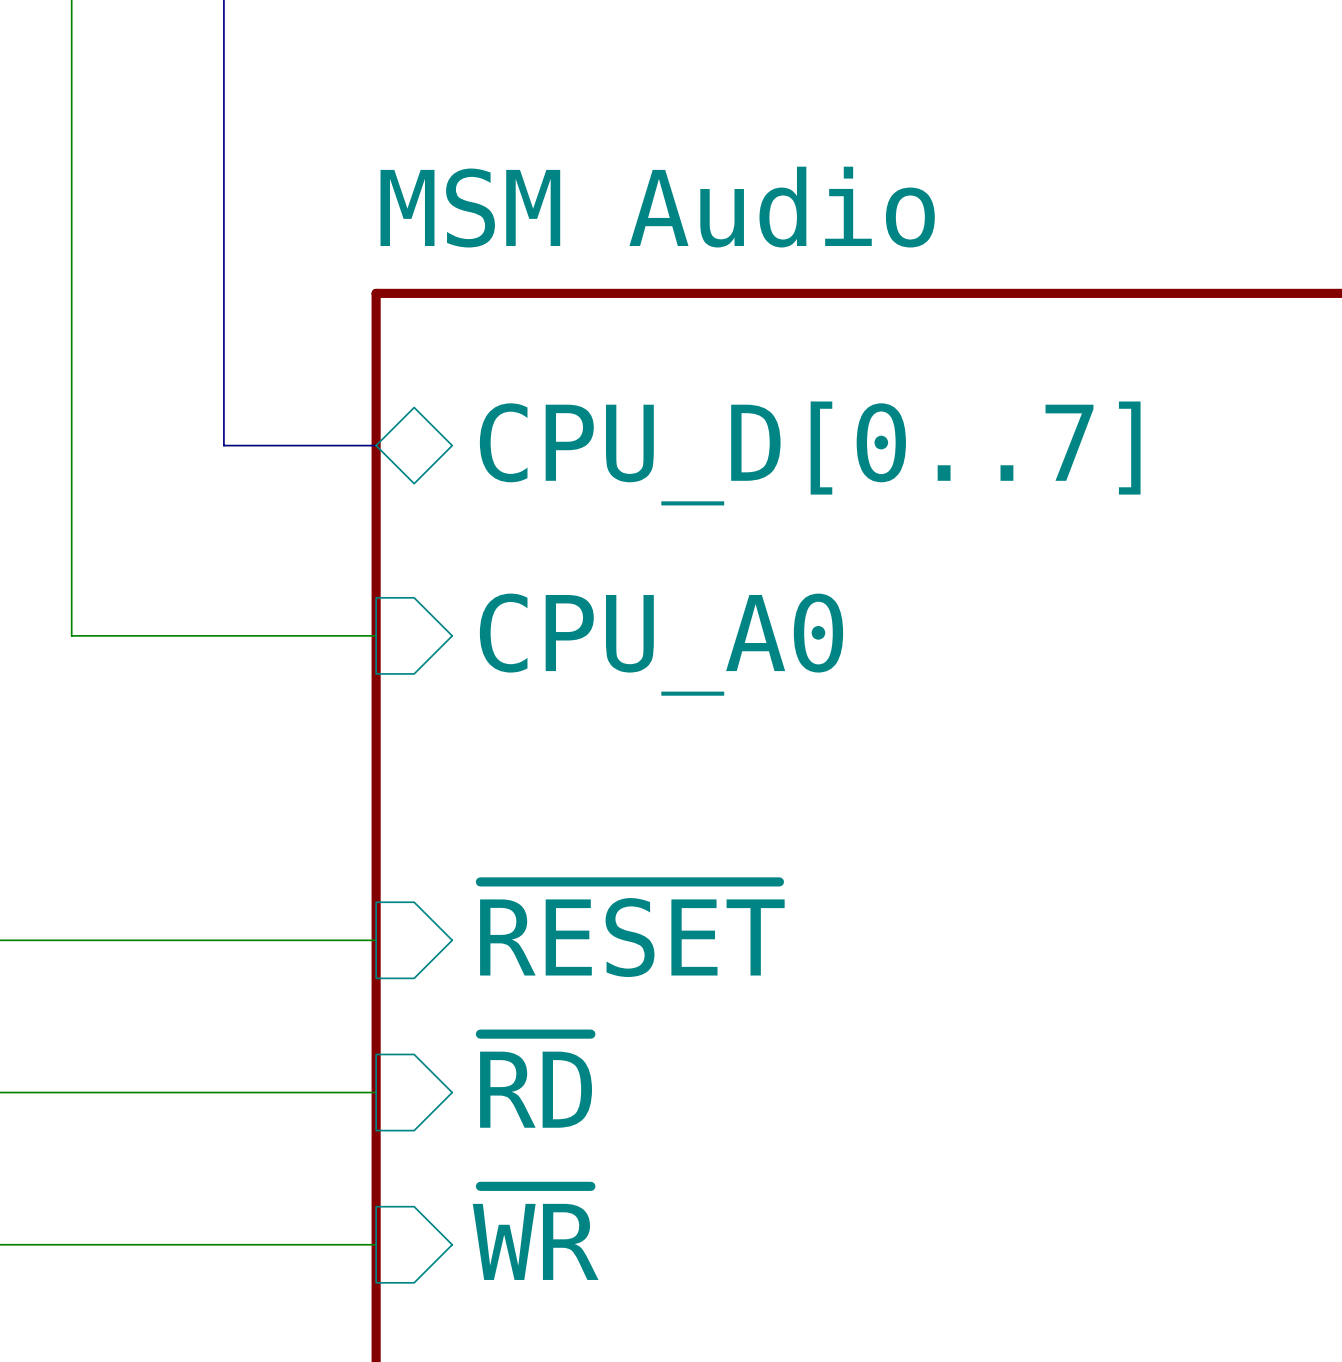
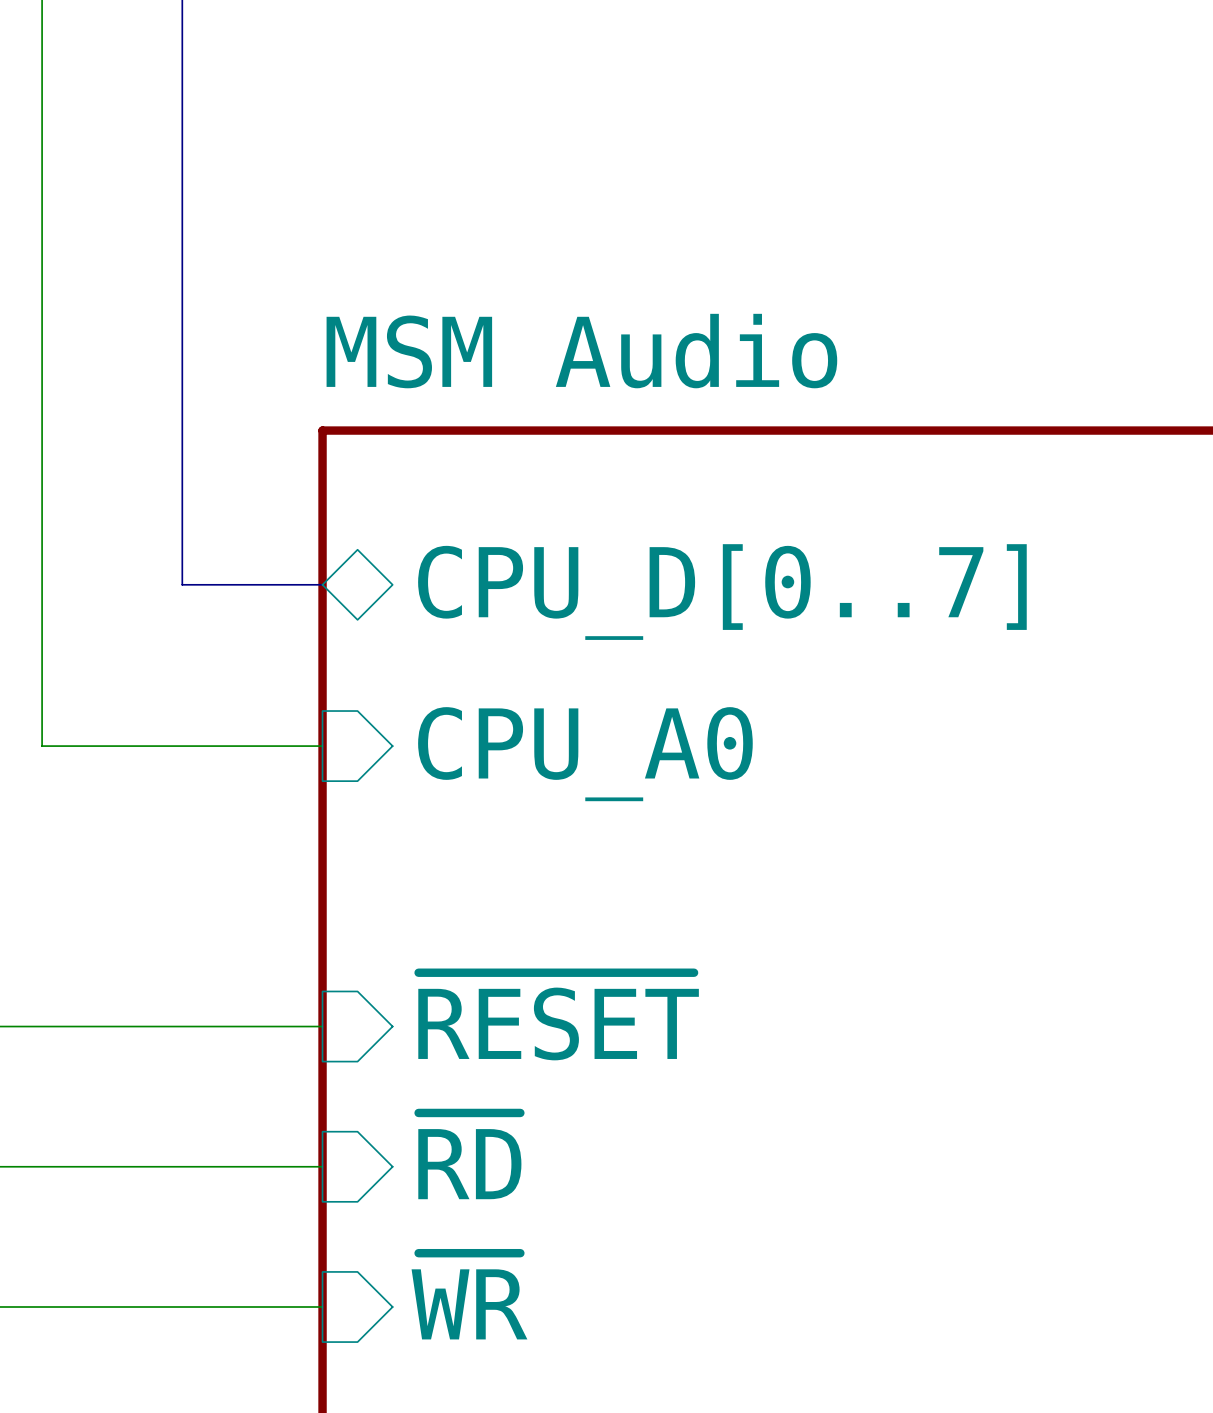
bus: (223, 445) (376, 445) -> (182, 570) (182, 584) (322, 584)
sheet pin position: CPU_D[0..7] (810, 453) -> CPU_D[0..7] (722, 592)

